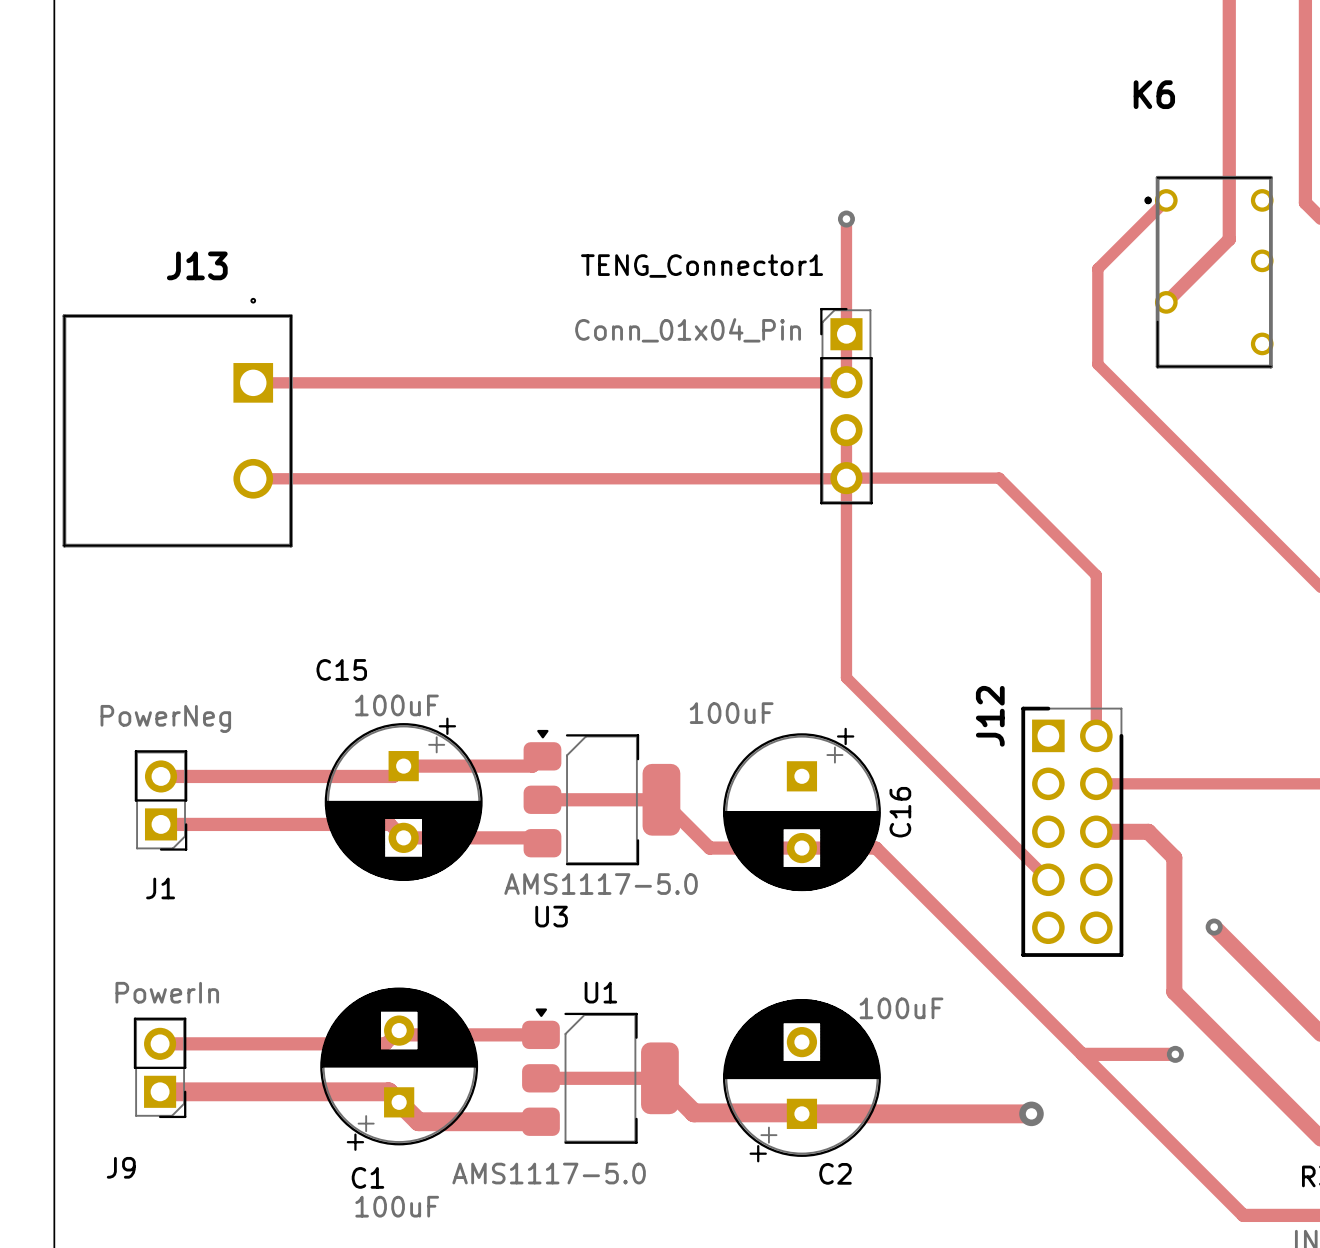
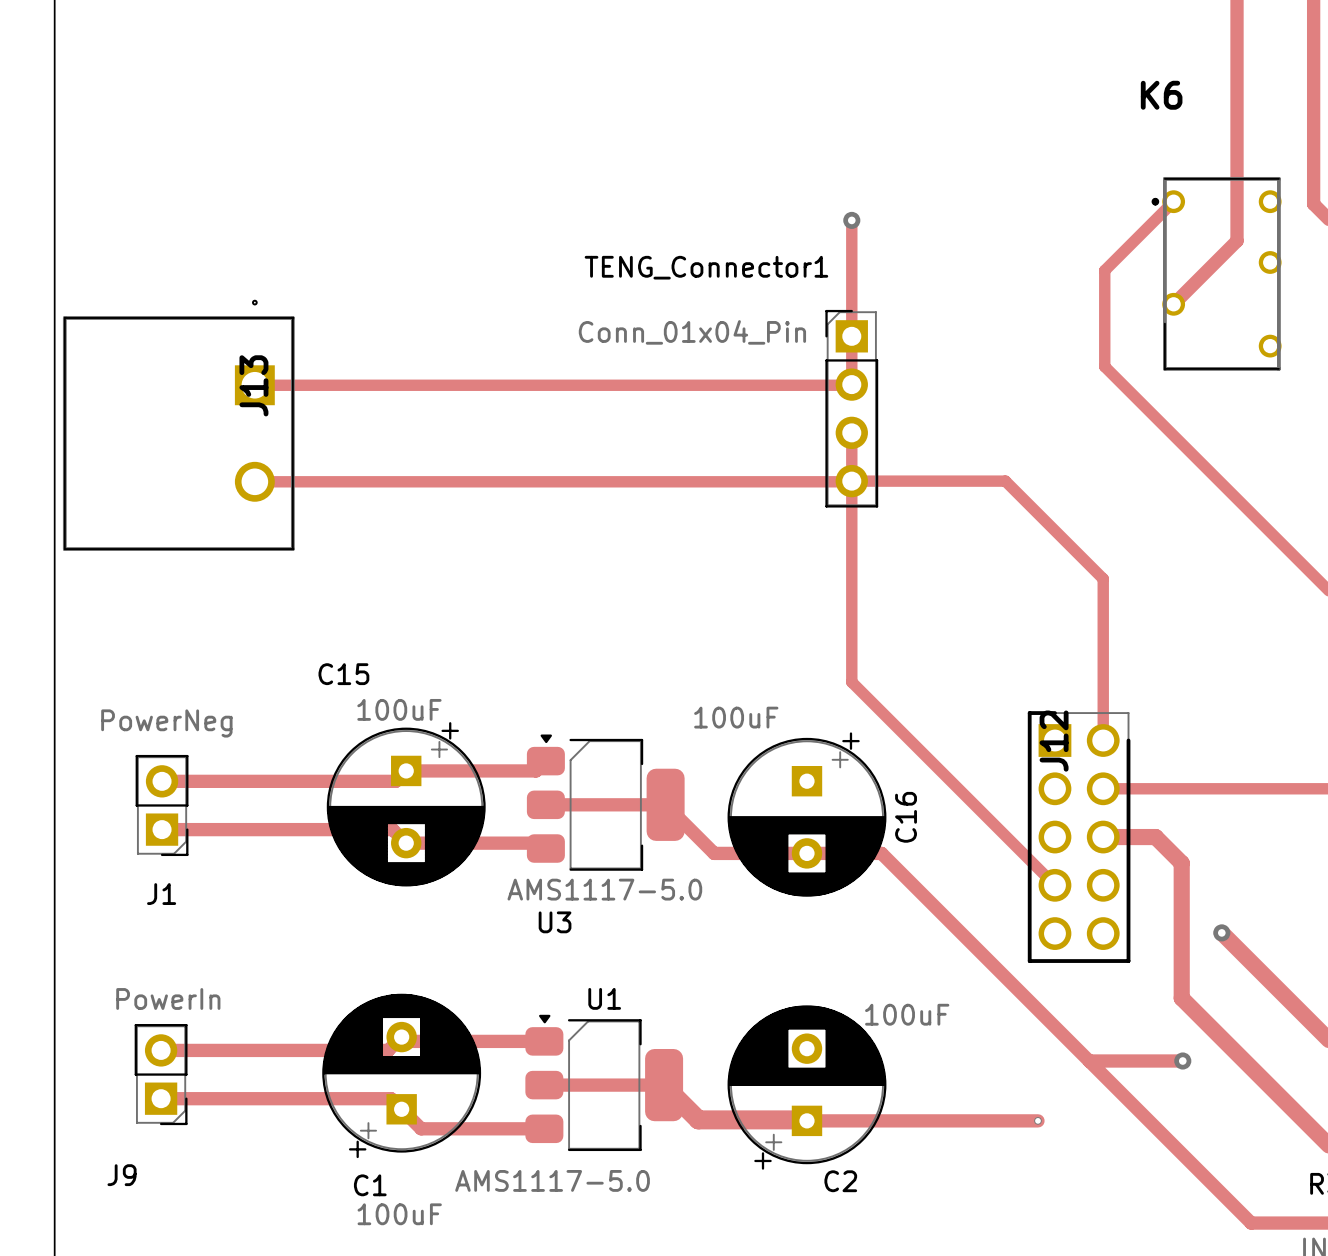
J13 name rotation: 0° (197, 265) -> 90° counterclockwise (253, 385)
J13 name position: J13 (197, 265) -> J13 (253, 385)
J12 name position: J12 (990, 716) -> J12 (1054, 741)
track width: thick (160, 1091) (388, 1091) (418, 1121) (540, 1121) -> thin (161, 1098) (391, 1098) (421, 1128) (544, 1128)
via size: [1019, 1101, 1044, 1127] -> [1034, 1117, 1042, 1125]
track width: thick (801, 1113) (1031, 1113) -> thin (806, 1120) (1037, 1120)

